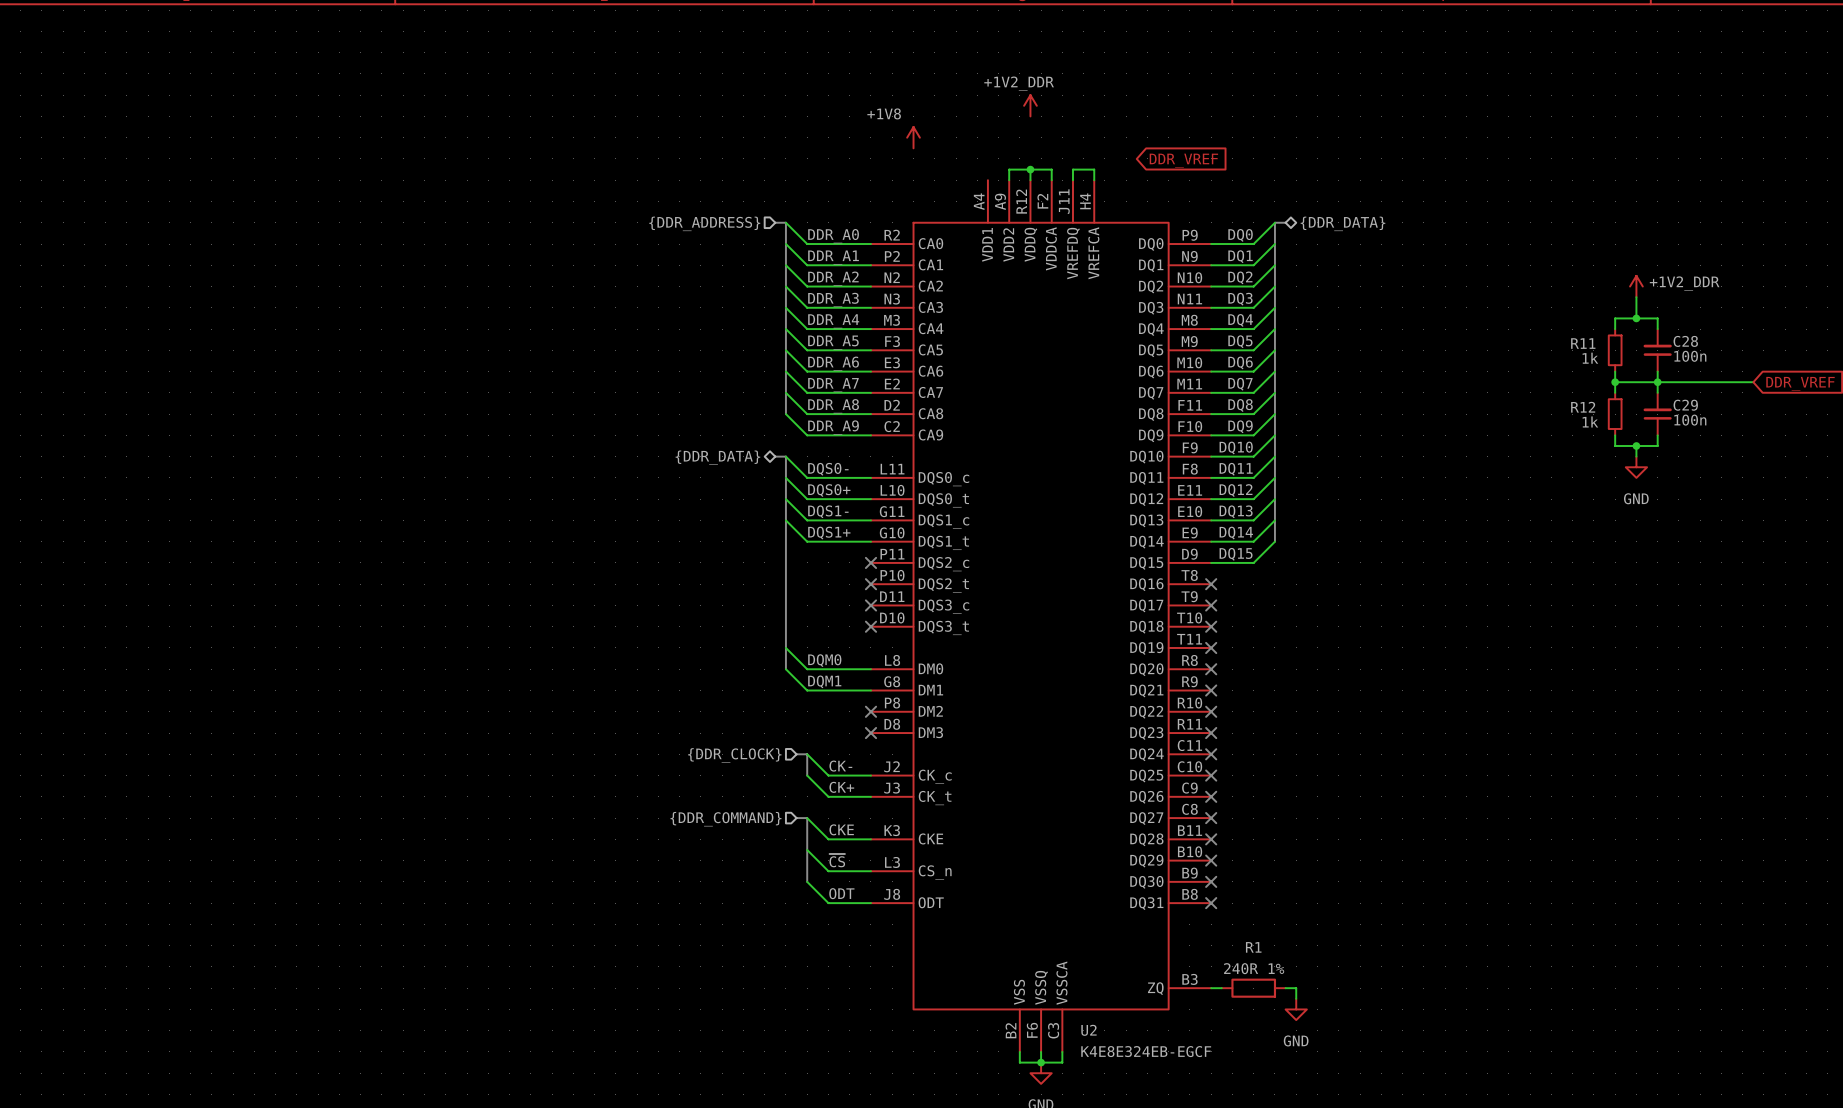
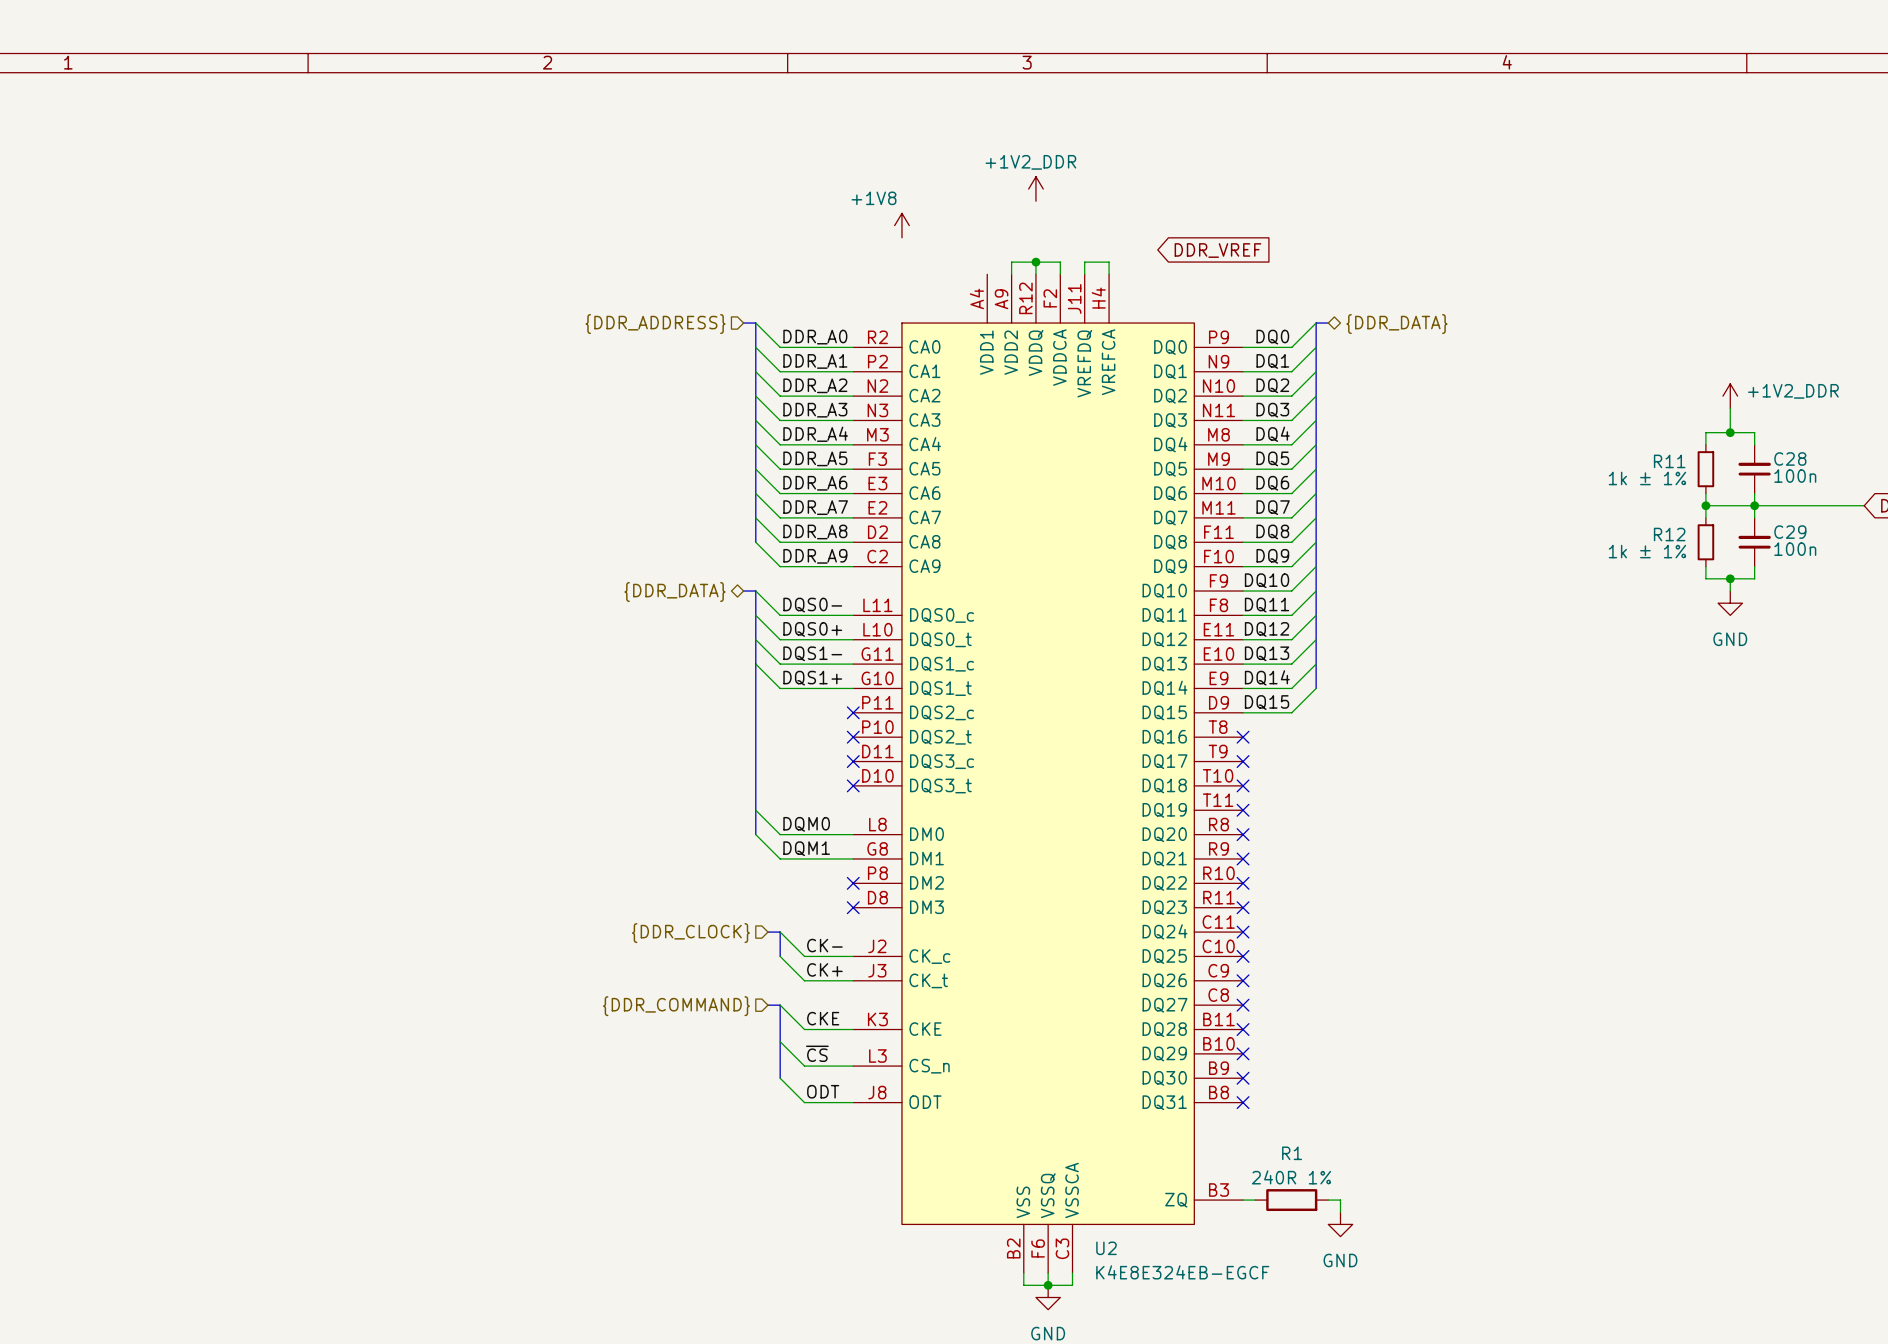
R11 value: 1k (1590, 358) -> 1k ± 1% (1647, 478)
R12 value: 1k (1590, 421) -> 1k ± 1% (1647, 551)

